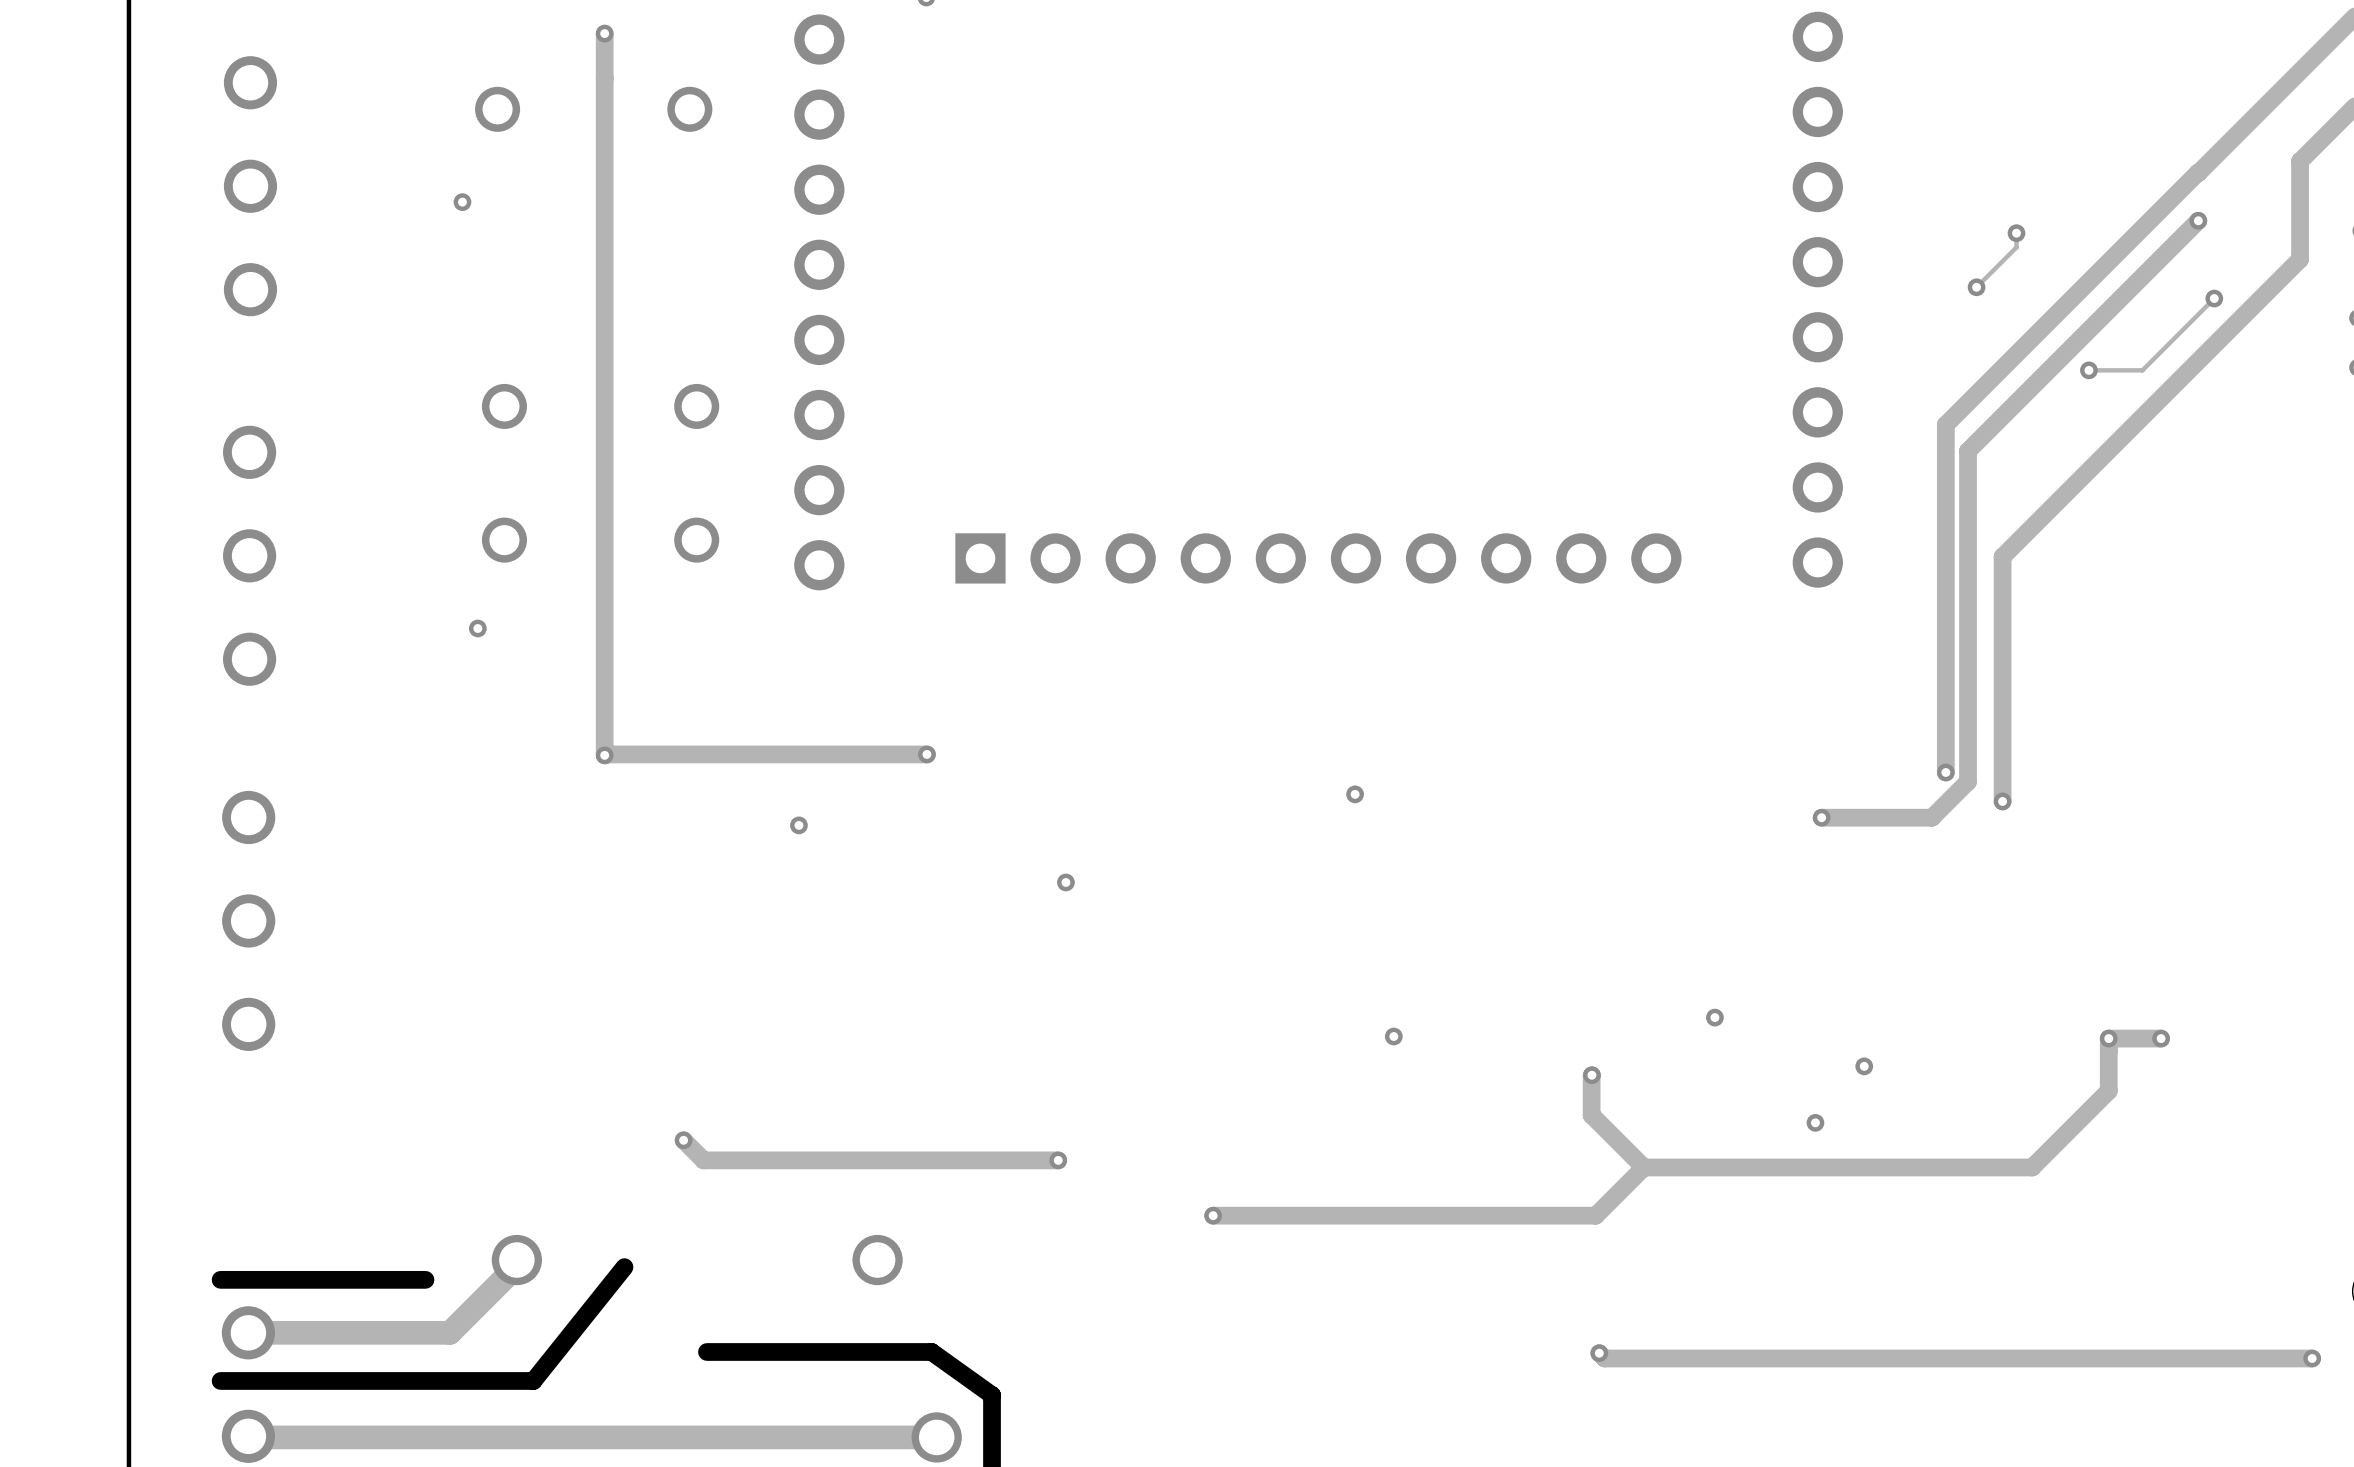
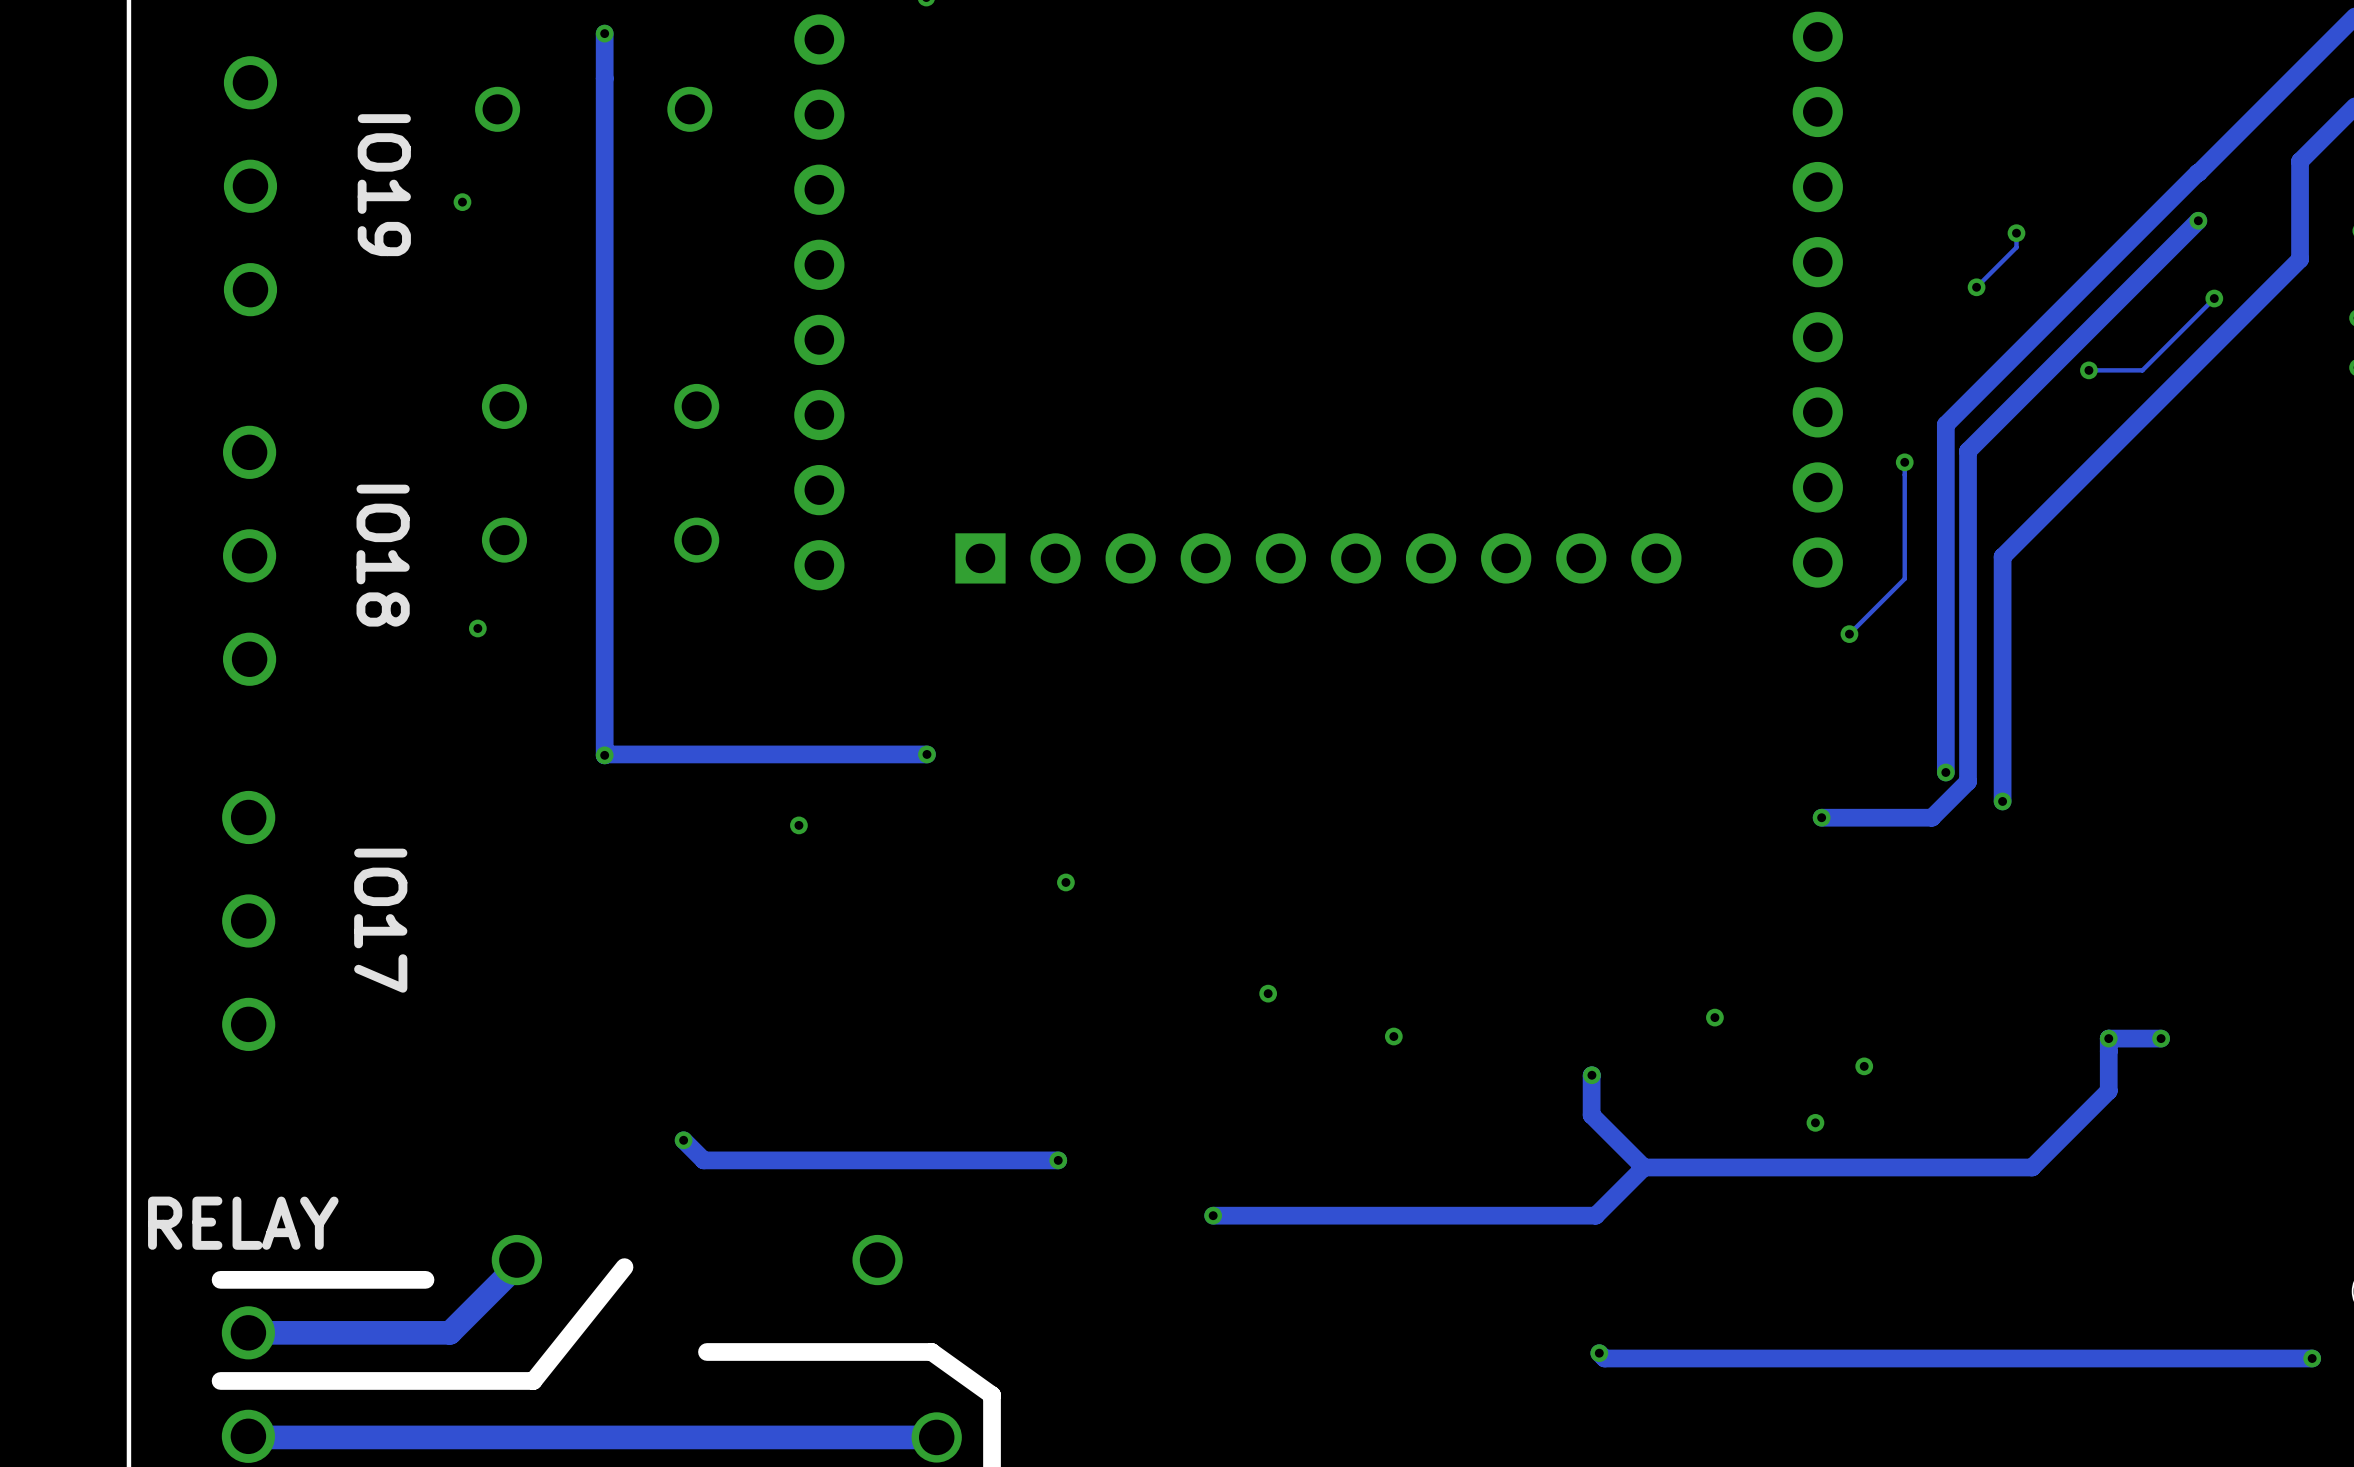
text: none -> IO19 (384, 185)
track: none -> (1904, 462) (1904, 578) (1849, 634)
via: none -> (1904, 462)
text: none -> IO18 (383, 555)
via: none -> (1849, 634)
via: (1355, 794) -> none
text: none -> IO17 (380, 920)
via: none -> (1268, 993)
text: none -> RELAY (243, 1223)

